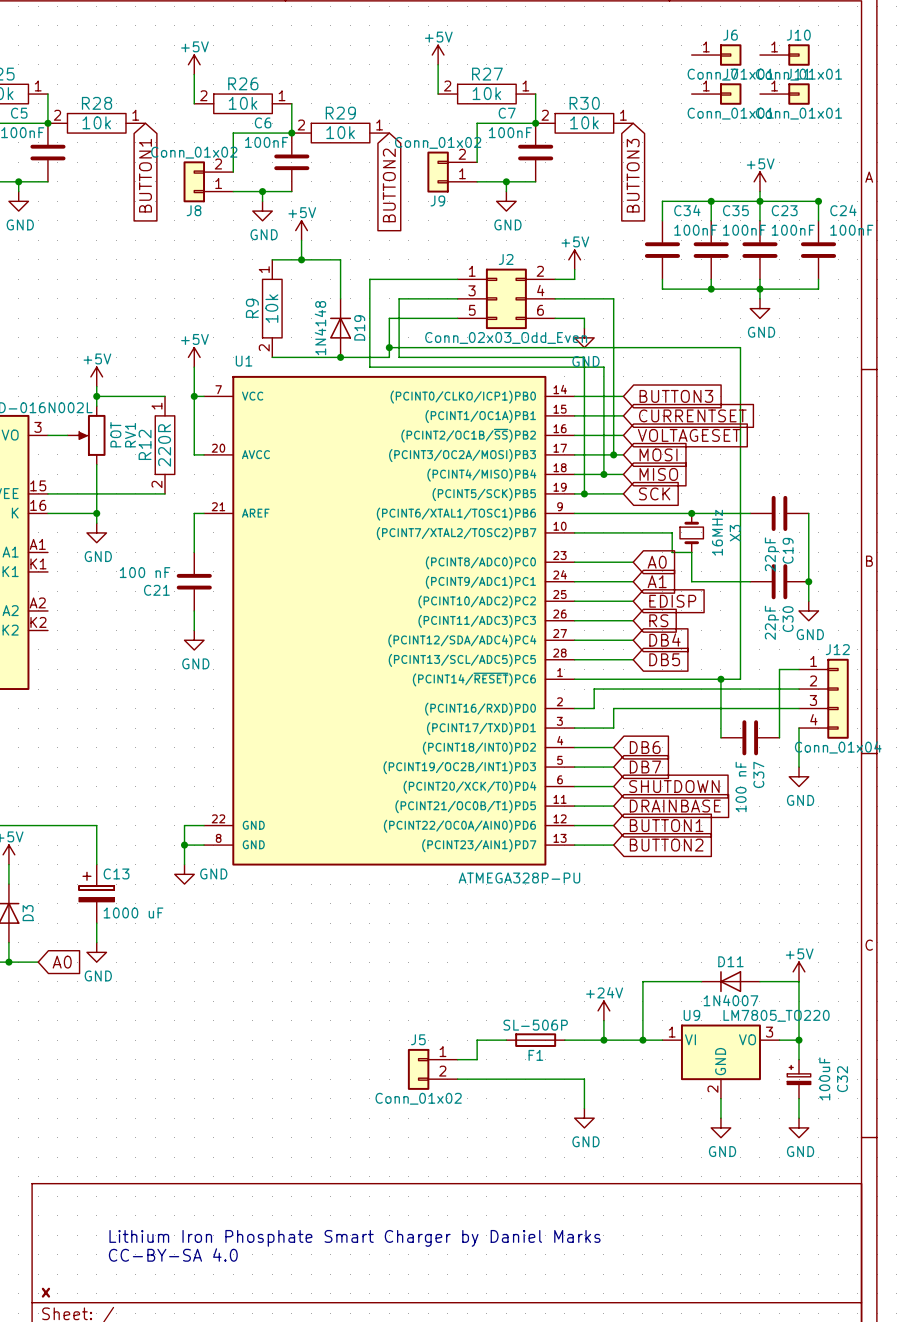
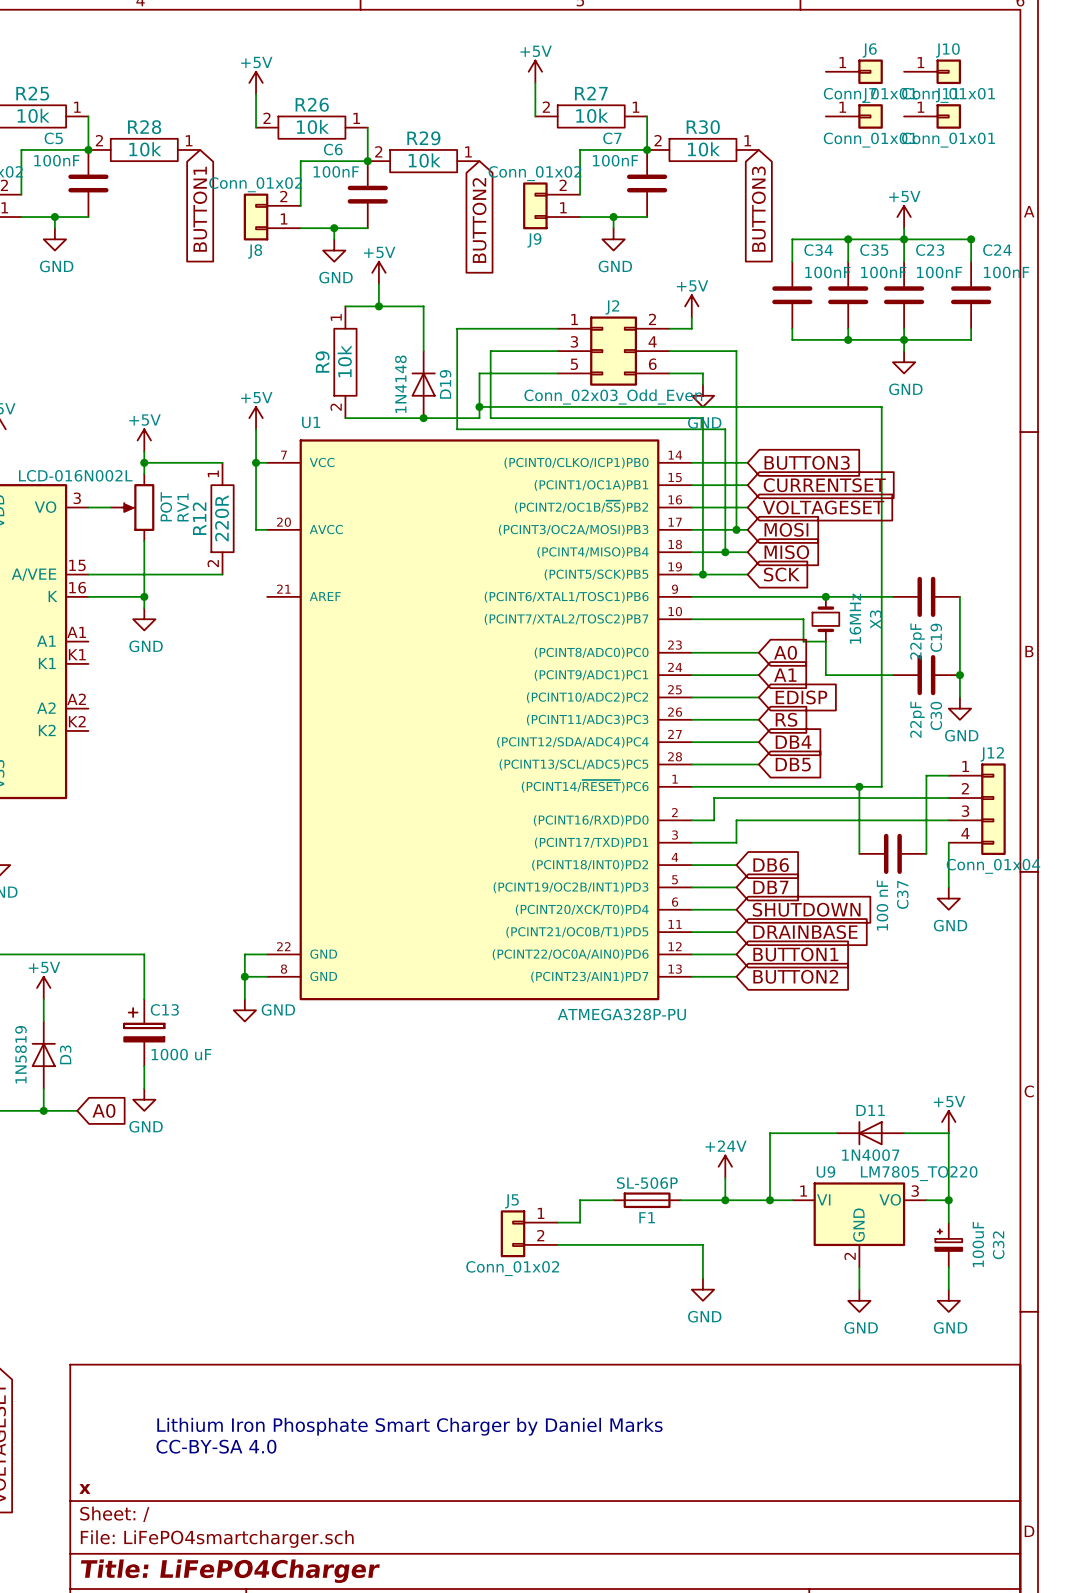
wire: (204, 513) (194, 513) (194, 552) -> none
C21: 100 nF (194, 581) -> none
wire: (194, 610) (194, 630) -> none
power symbol: GND (194, 640) -> none

